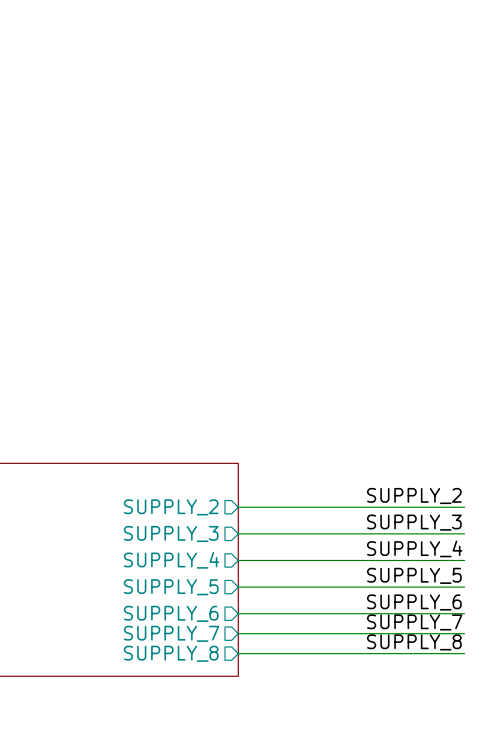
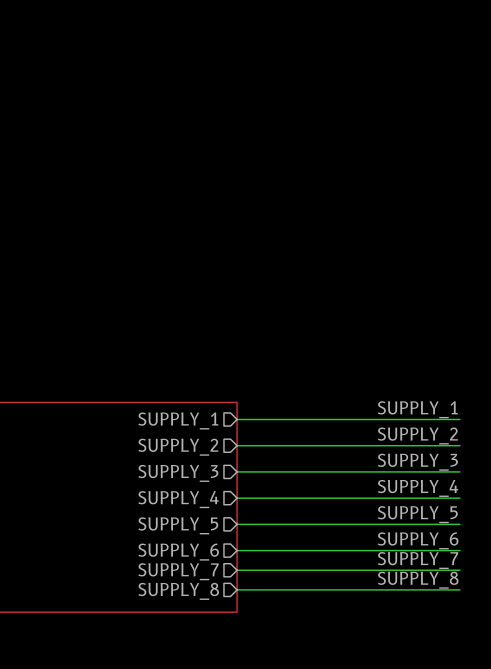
label: none -> SUPPLY_1 (417, 409)
sheet pin: none -> SUPPLY_1 (178, 420)
wire: none -> (237, 419) (459, 419)

